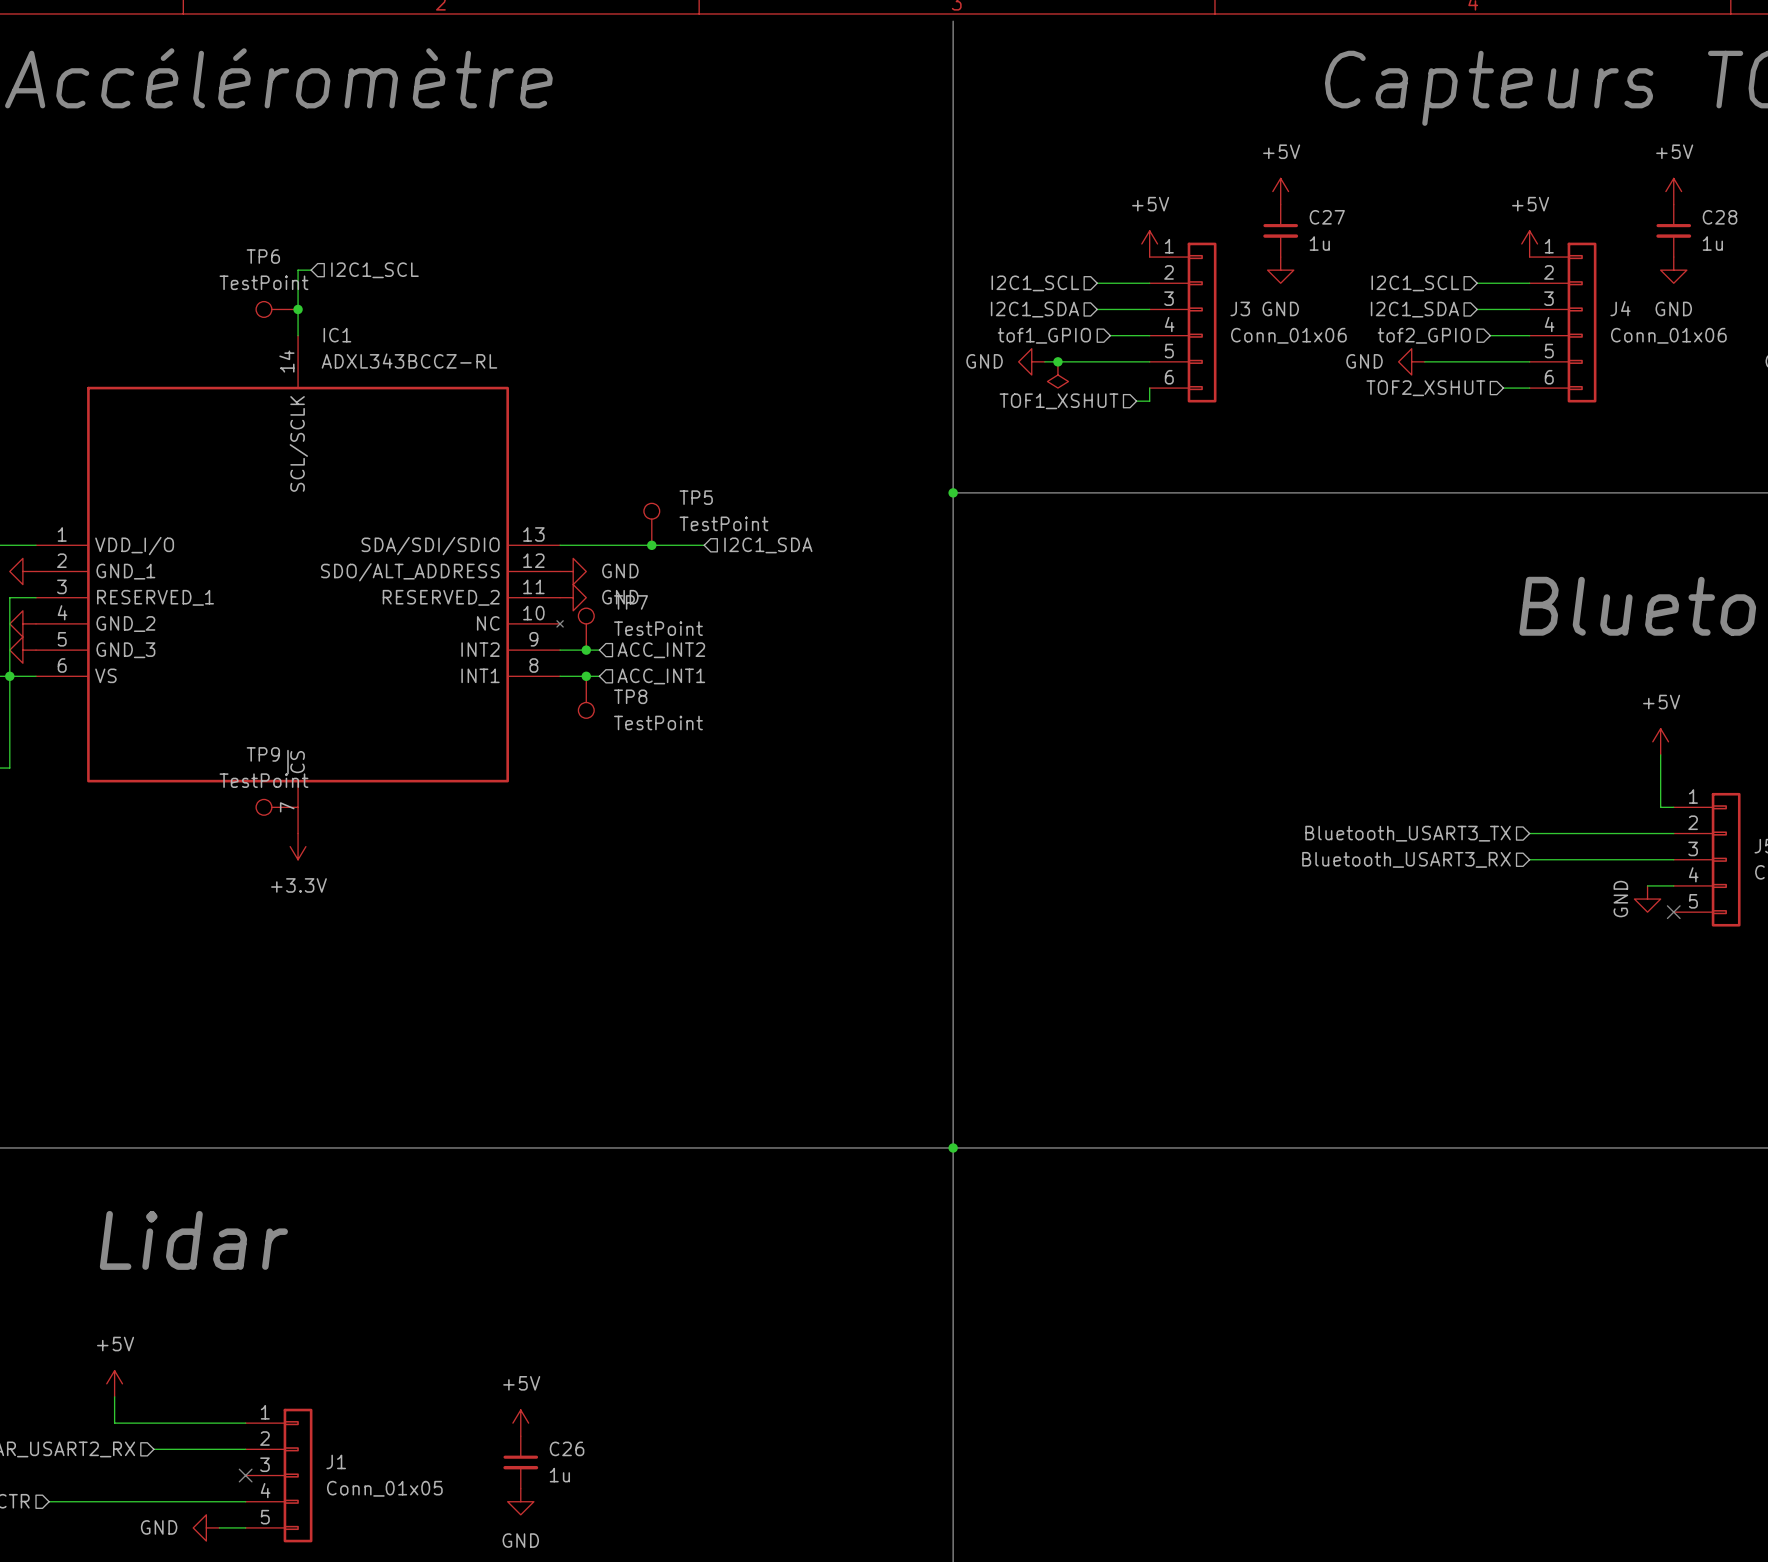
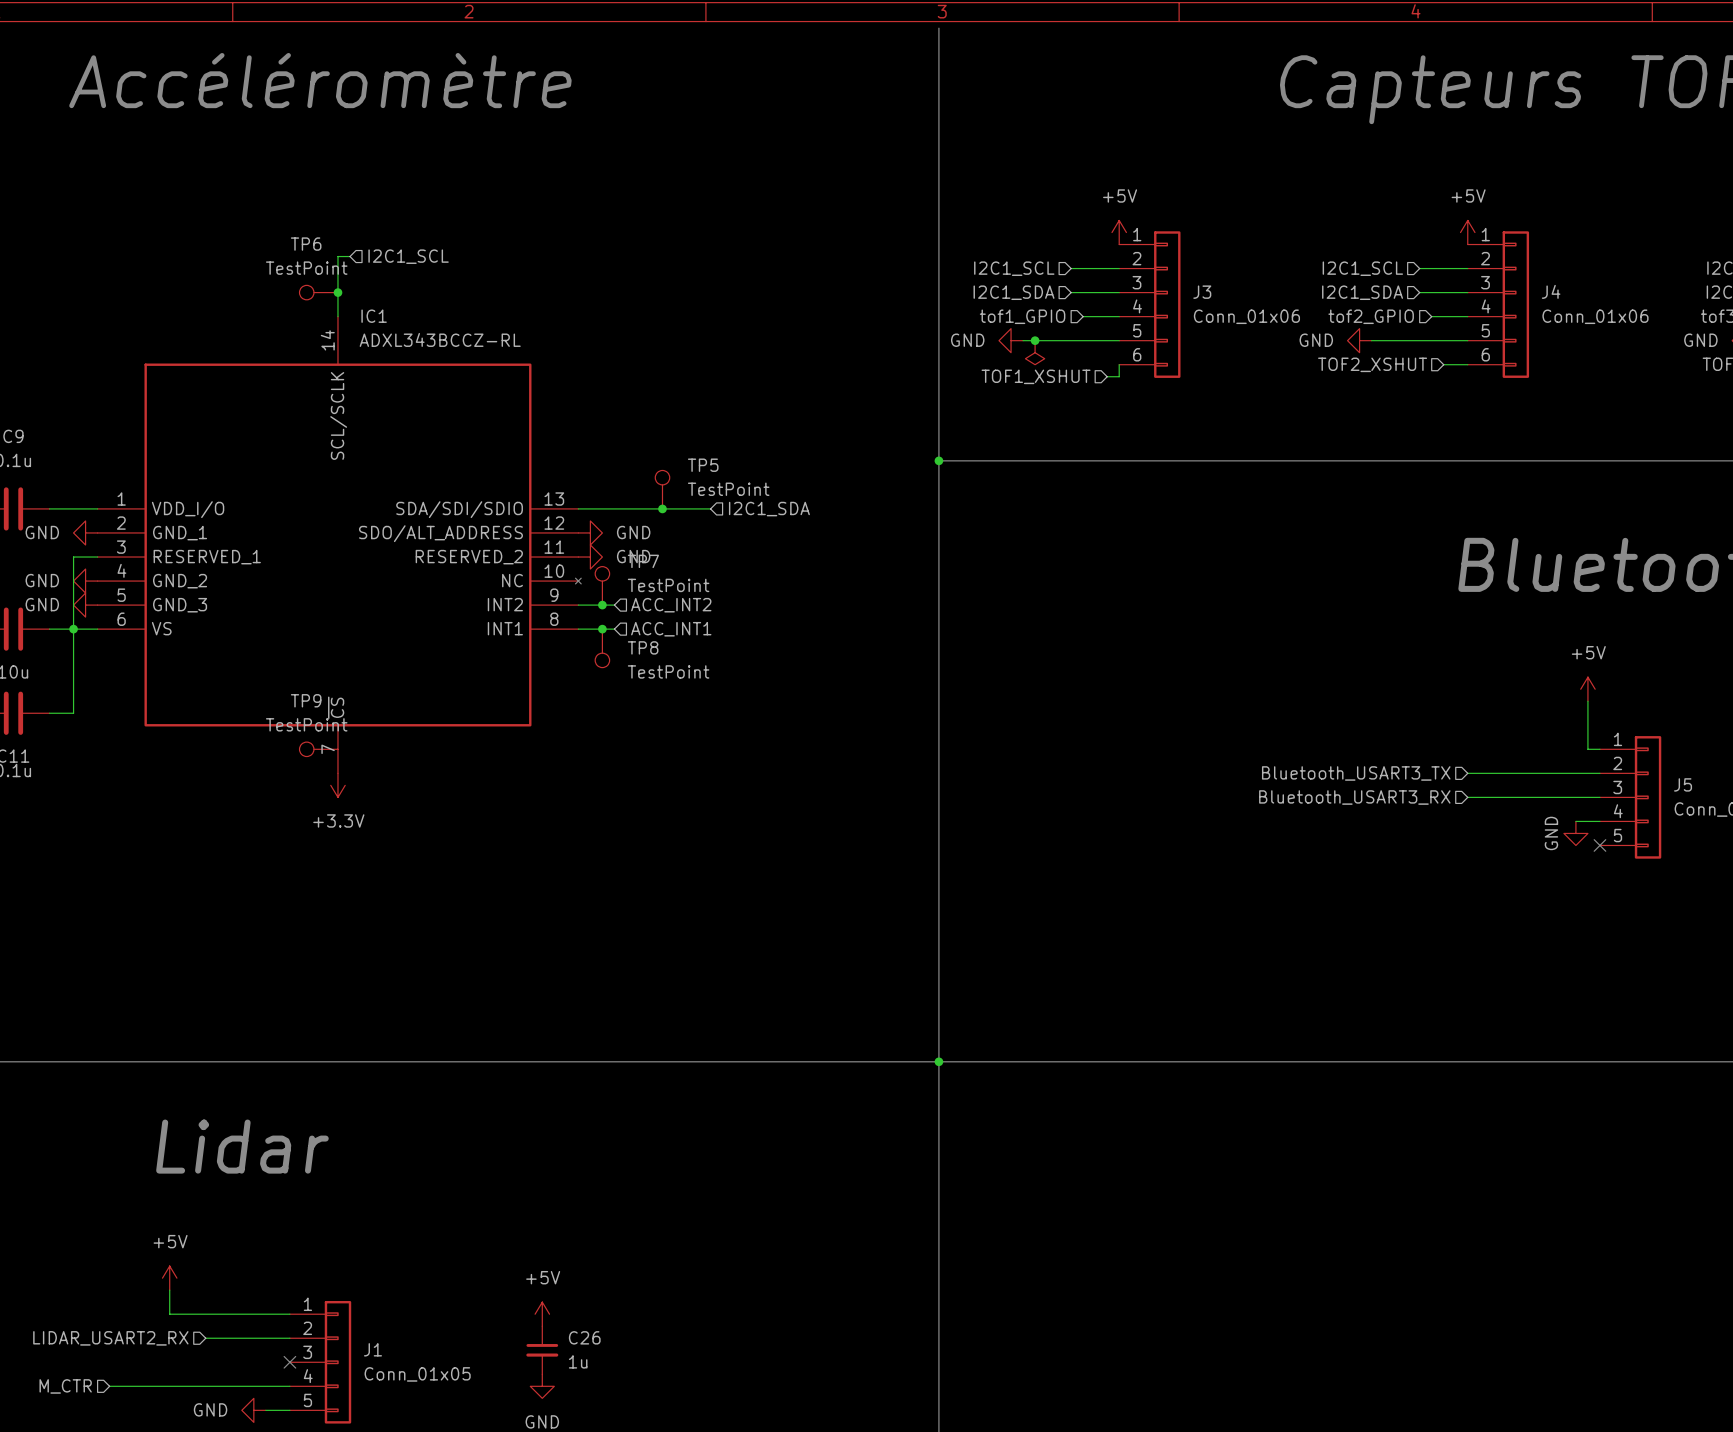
power symbol: +5V (1280, 191) -> none
power symbol: +5V (1673, 191) -> none
C27: 1u (1280, 230) -> none
C28: 1u (1673, 230) -> none
power symbol: GND (1280, 270) -> none
power symbol: GND (1673, 270) -> none

